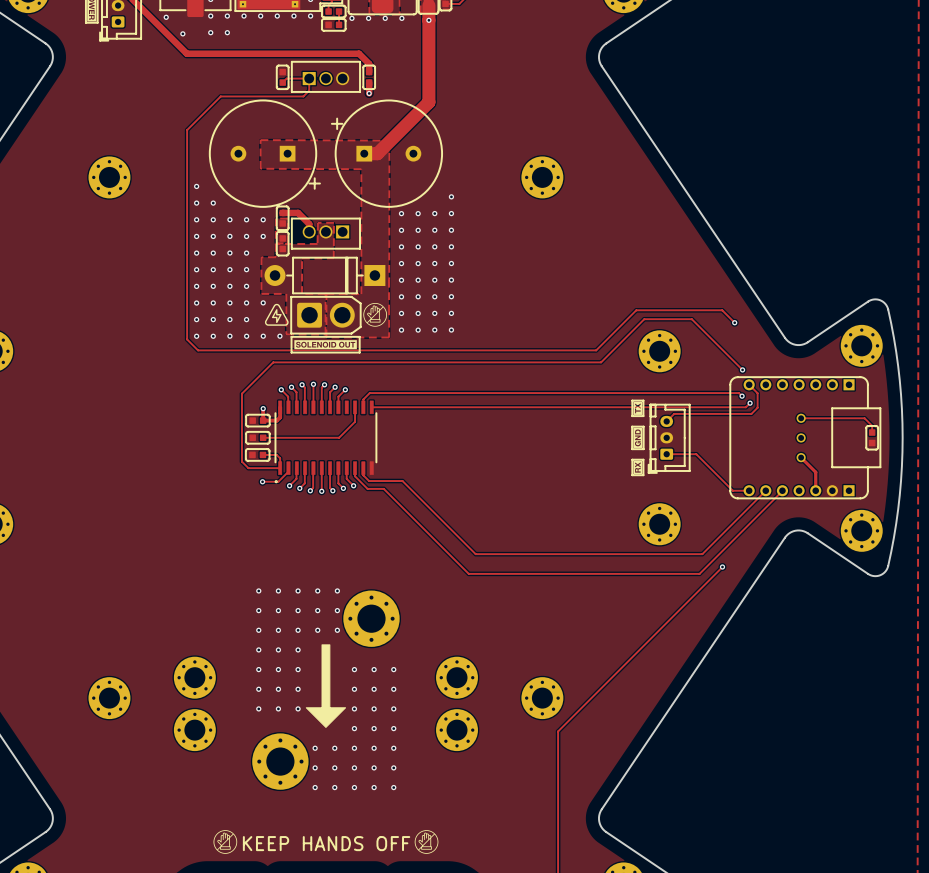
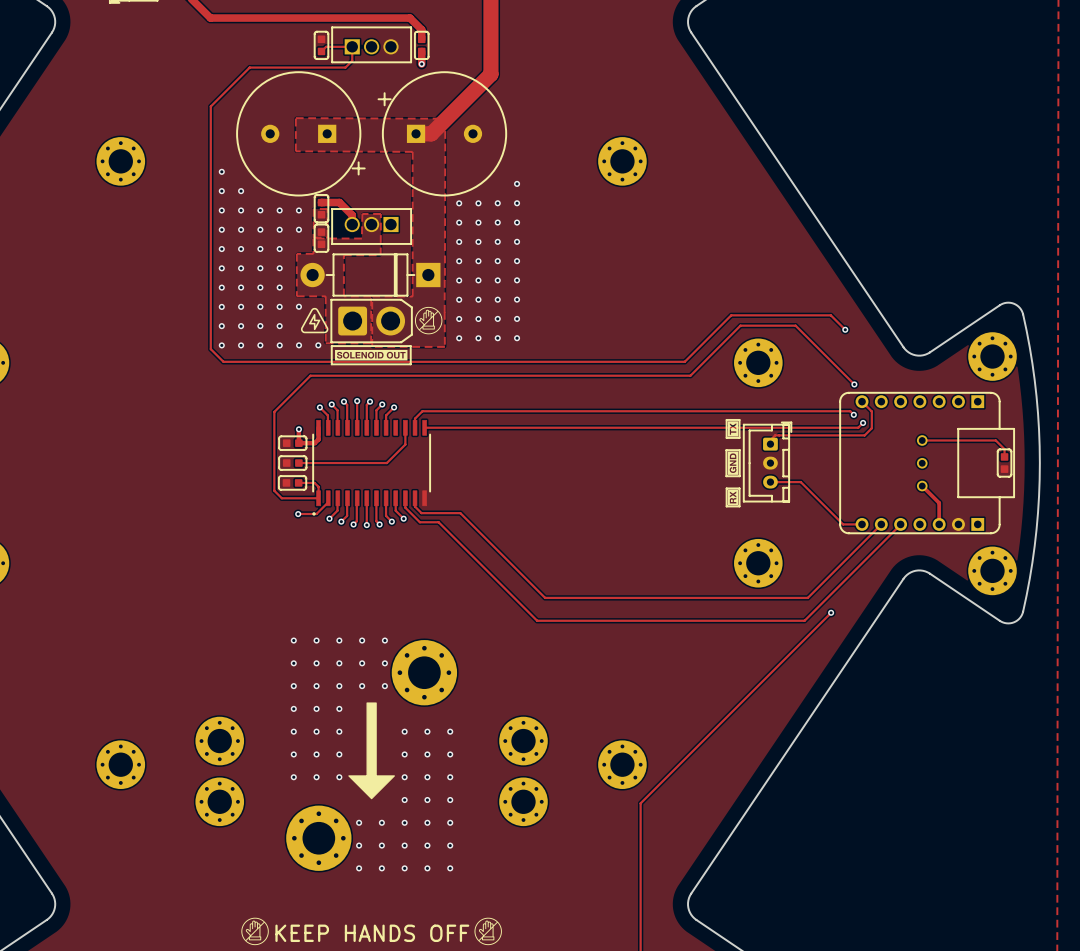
part rotation: 0° (669, 438) -> 180° (767, 462)

